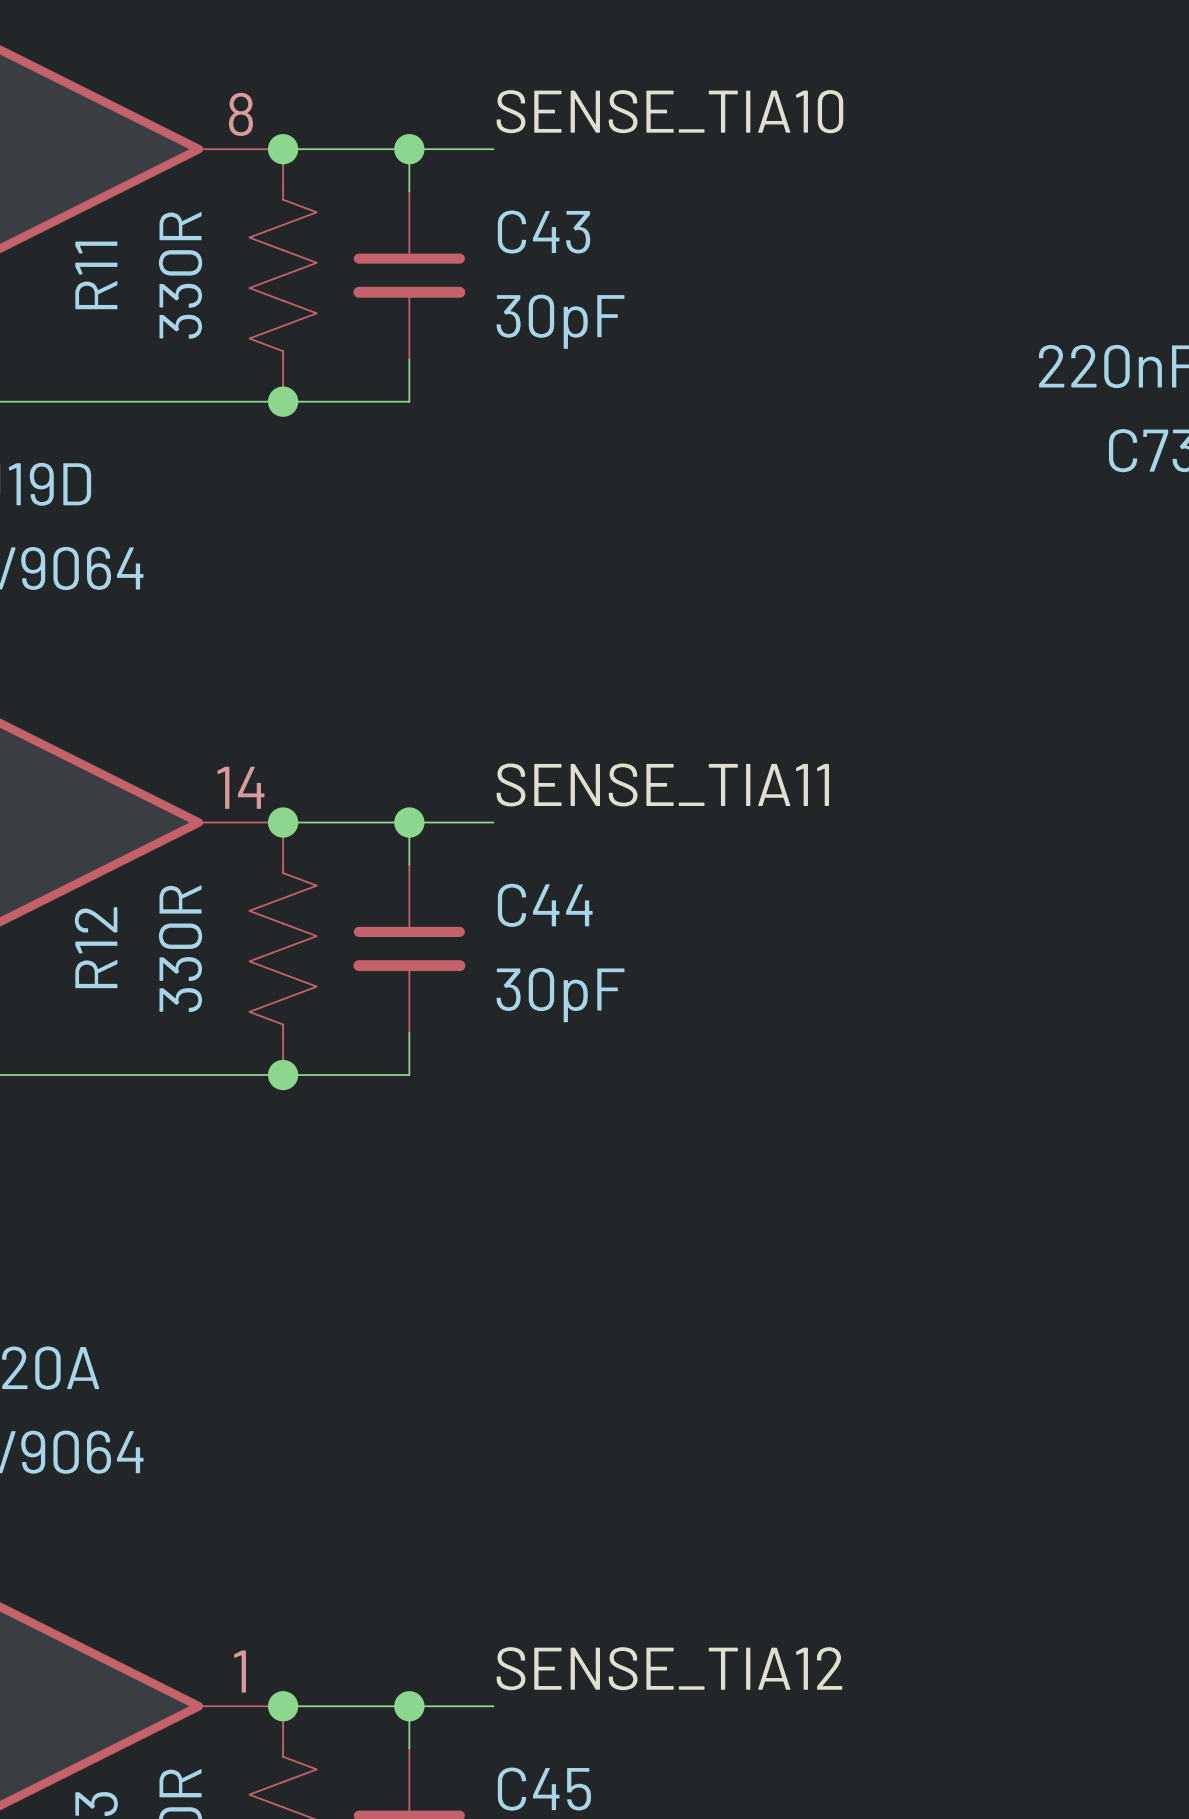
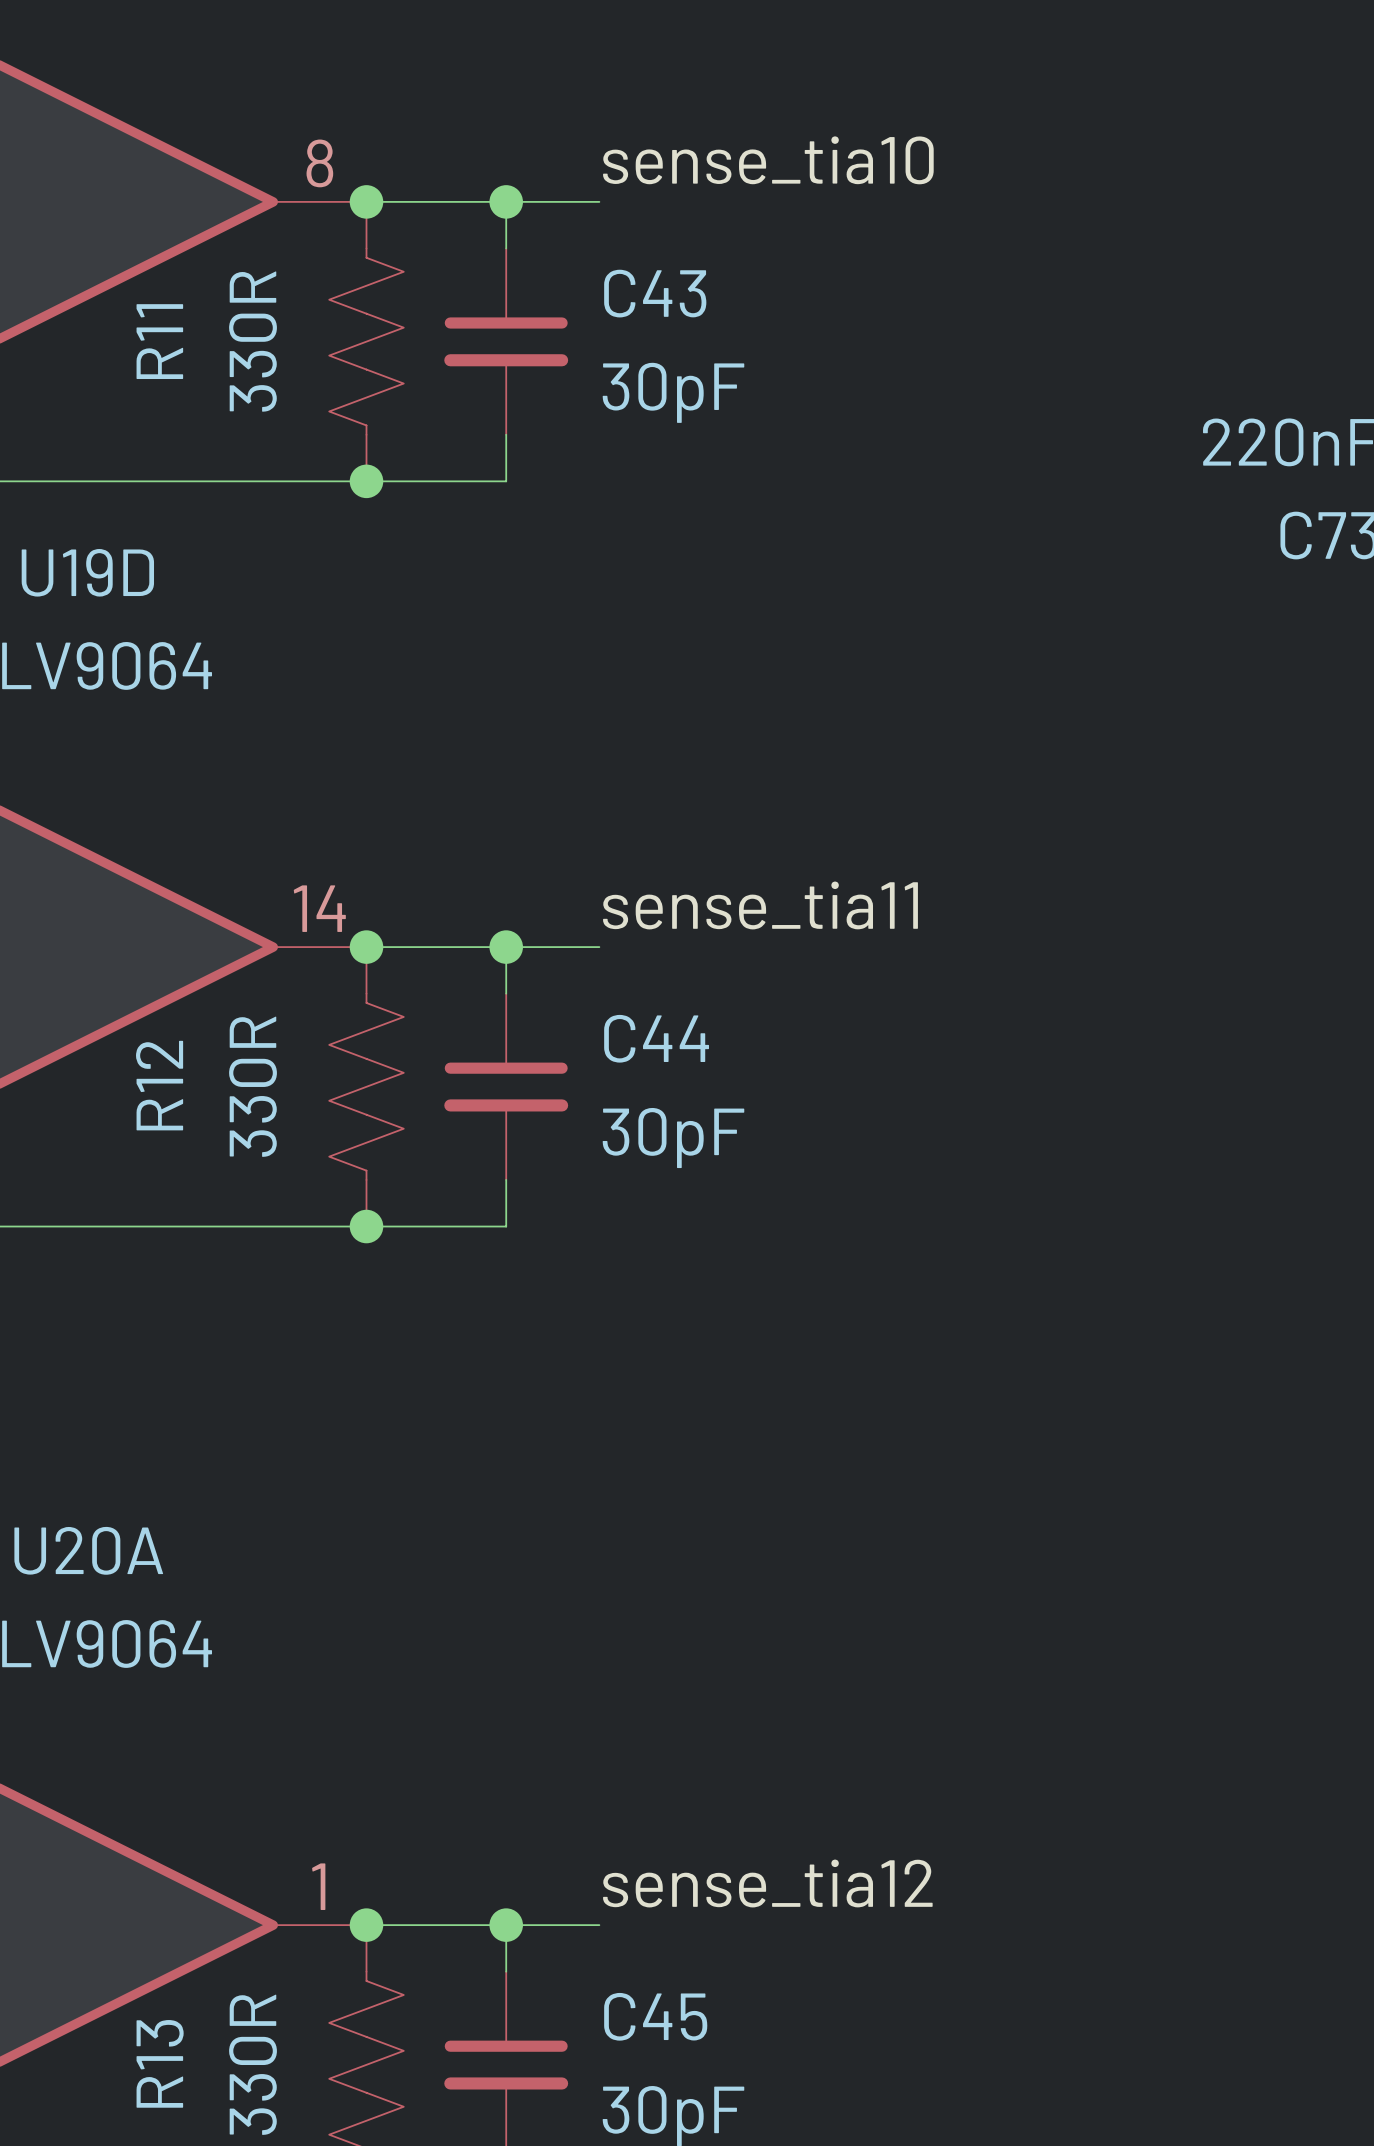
label: SENSE_TIA10 (669, 111) -> sense_tia10 (768, 160)
label: SENSE_TIA11 (662, 784) -> sense_tia11 (760, 905)
label: SENSE_TIA12 (669, 1668) -> sense_tia12 (767, 1883)

